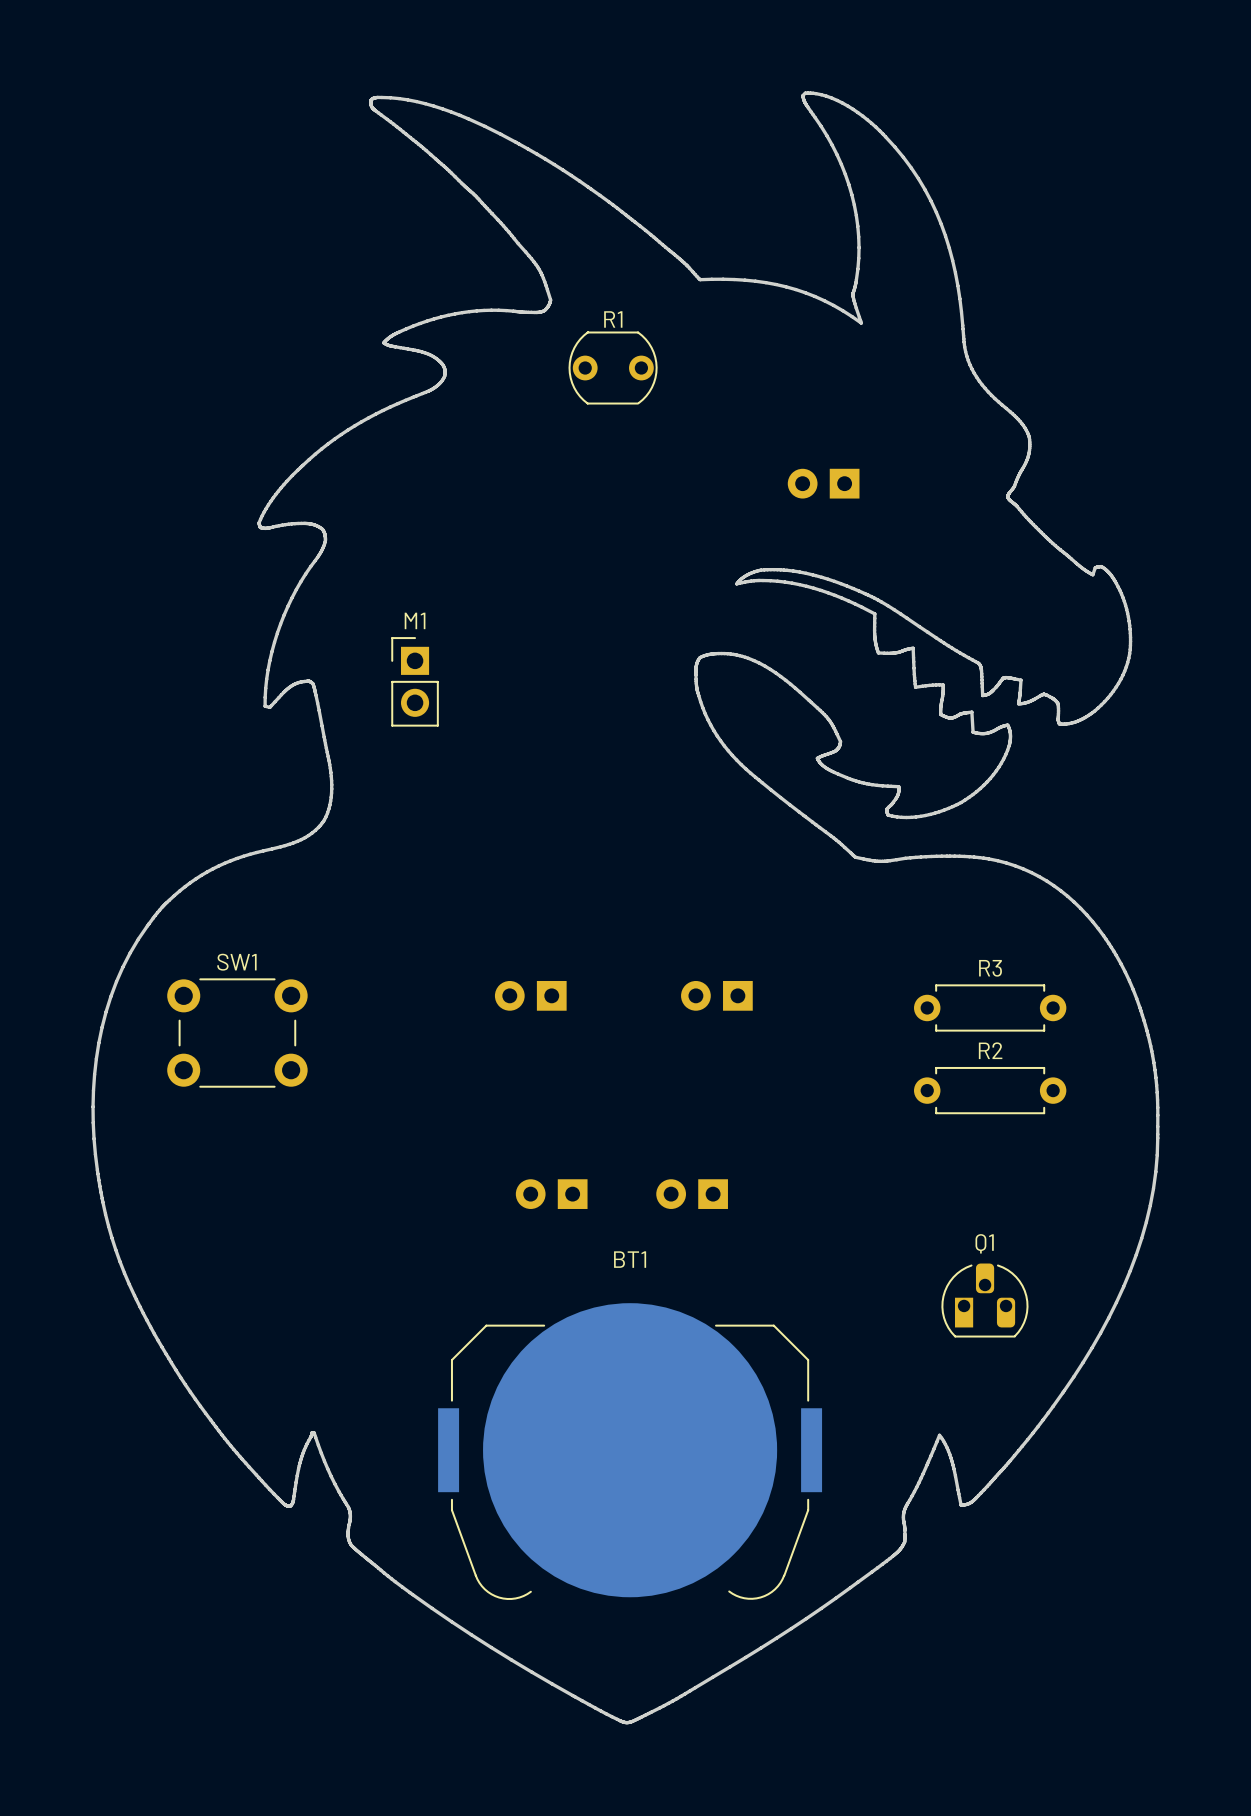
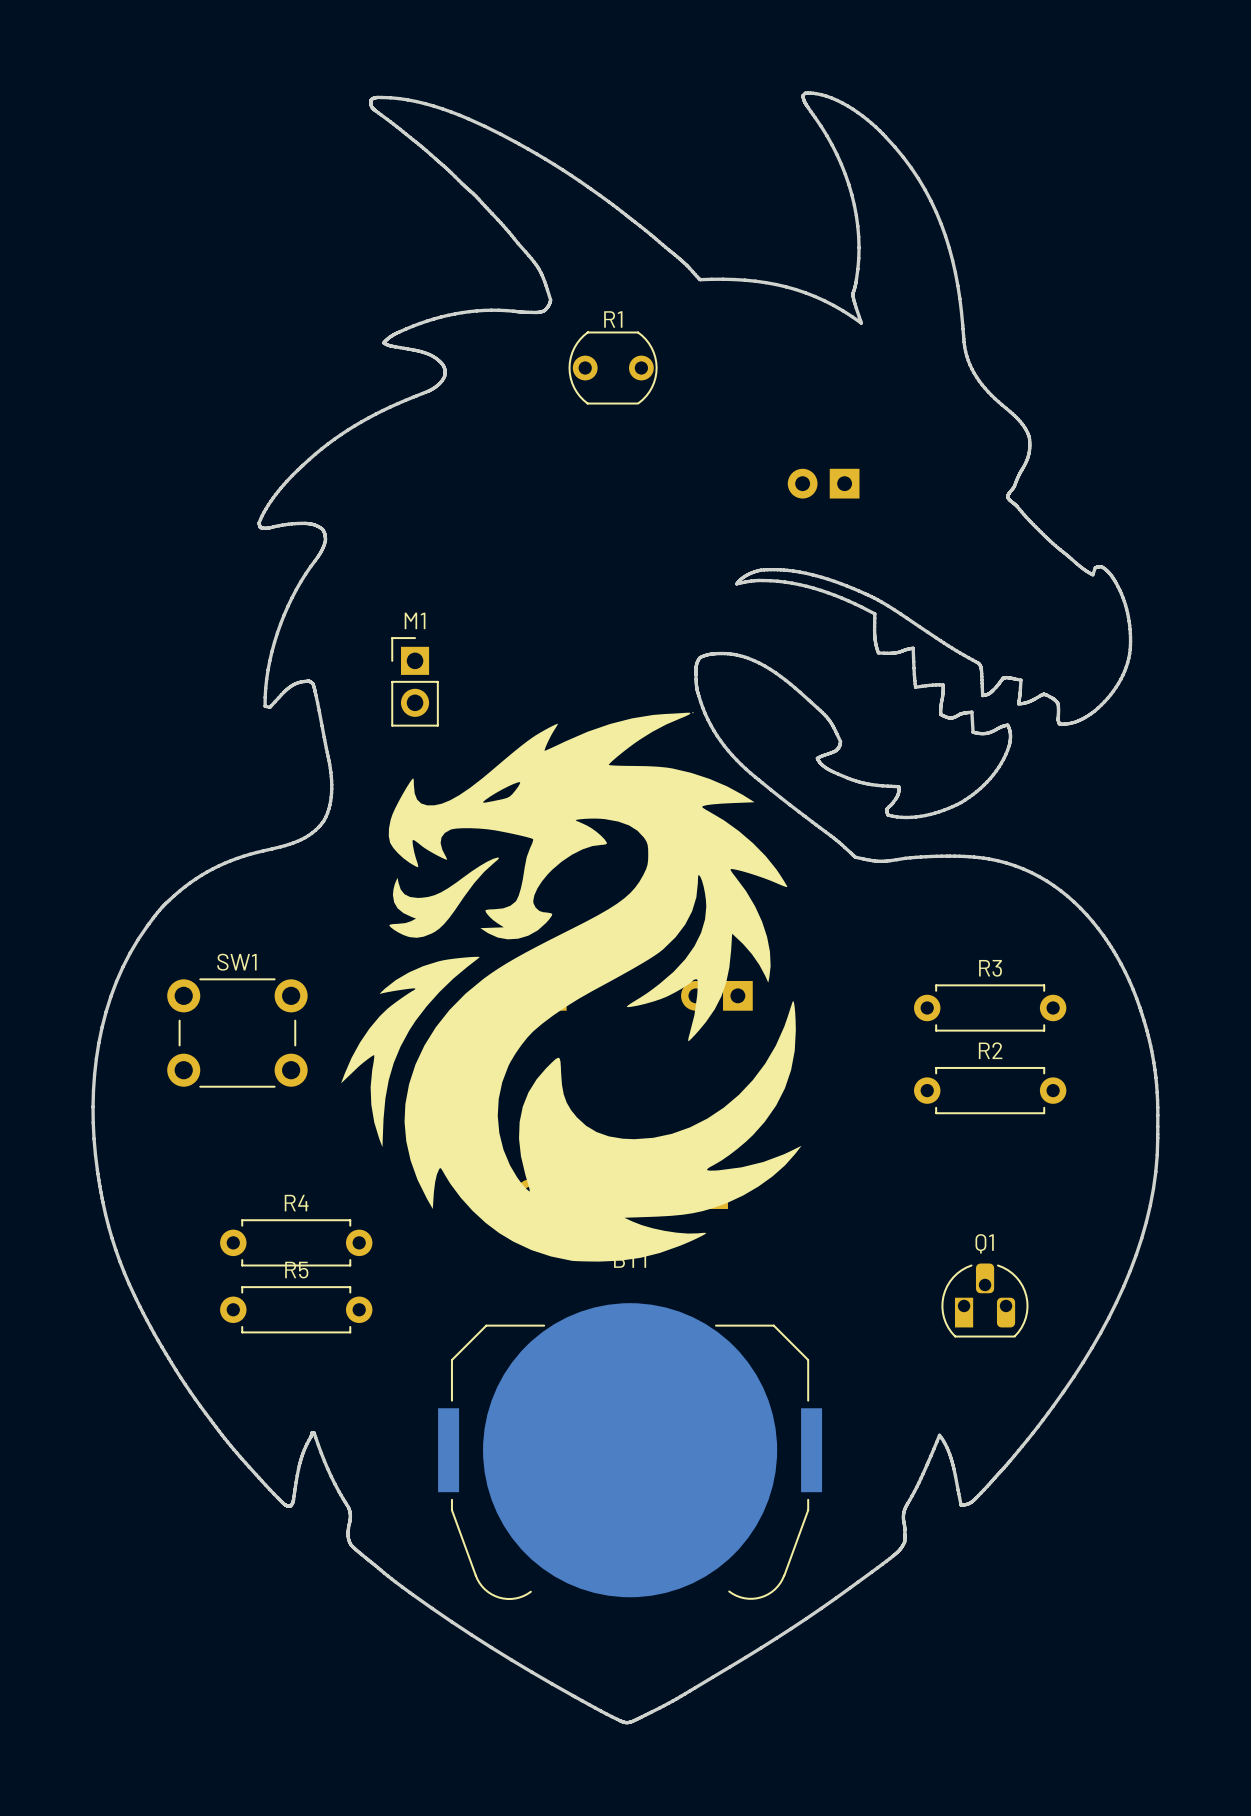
part: none -> (571, 986)
R4: none -> (296, 1242)
R5: none -> (296, 1309)

